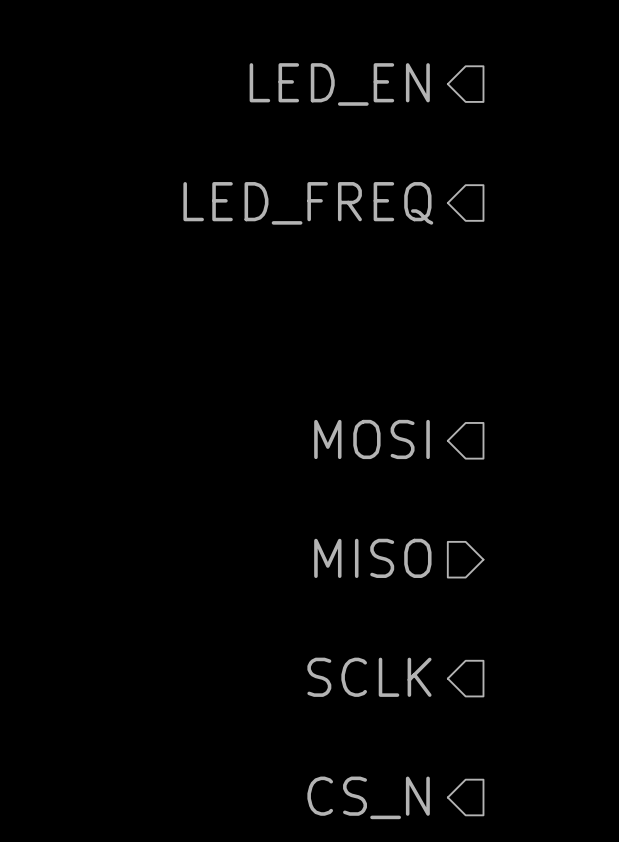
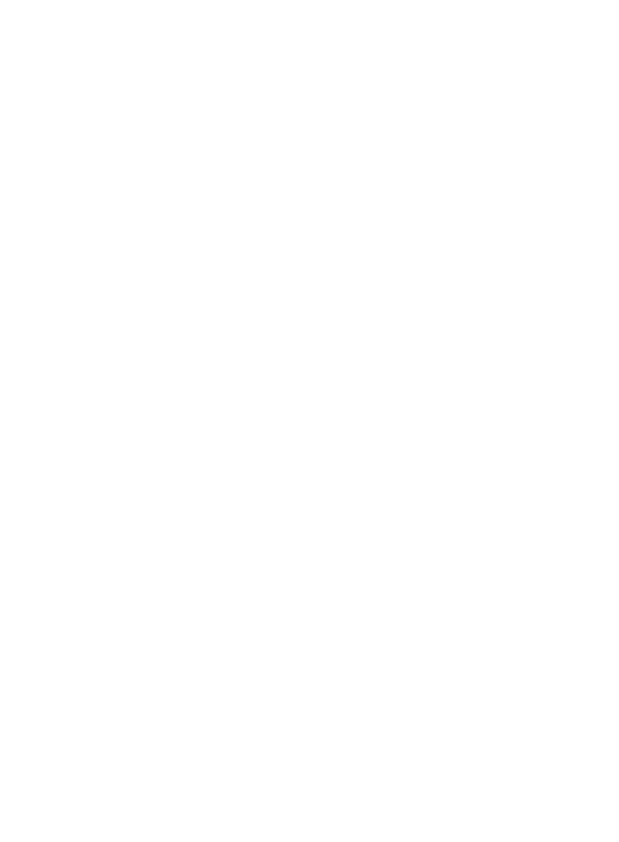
hierarchical label: LED_EN (339, 84) -> none
hierarchical label: LED_FREQ (308, 203) -> none
hierarchical label: MOSI (372, 439) -> none
hierarchical label: MISO (372, 558) -> none
hierarchical label: SCLK (369, 677) -> none
hierarchical label: CS_N (368, 797) -> none

